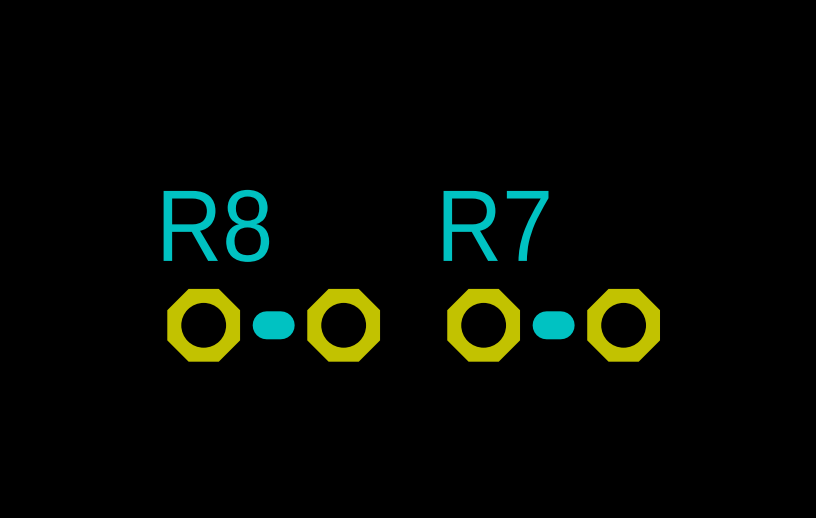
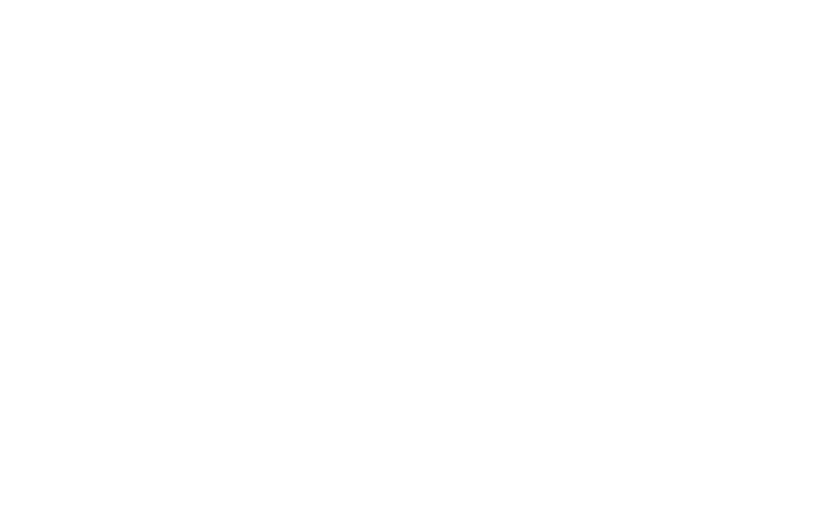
R8: (273, 325) -> none
R7: (553, 325) -> none

